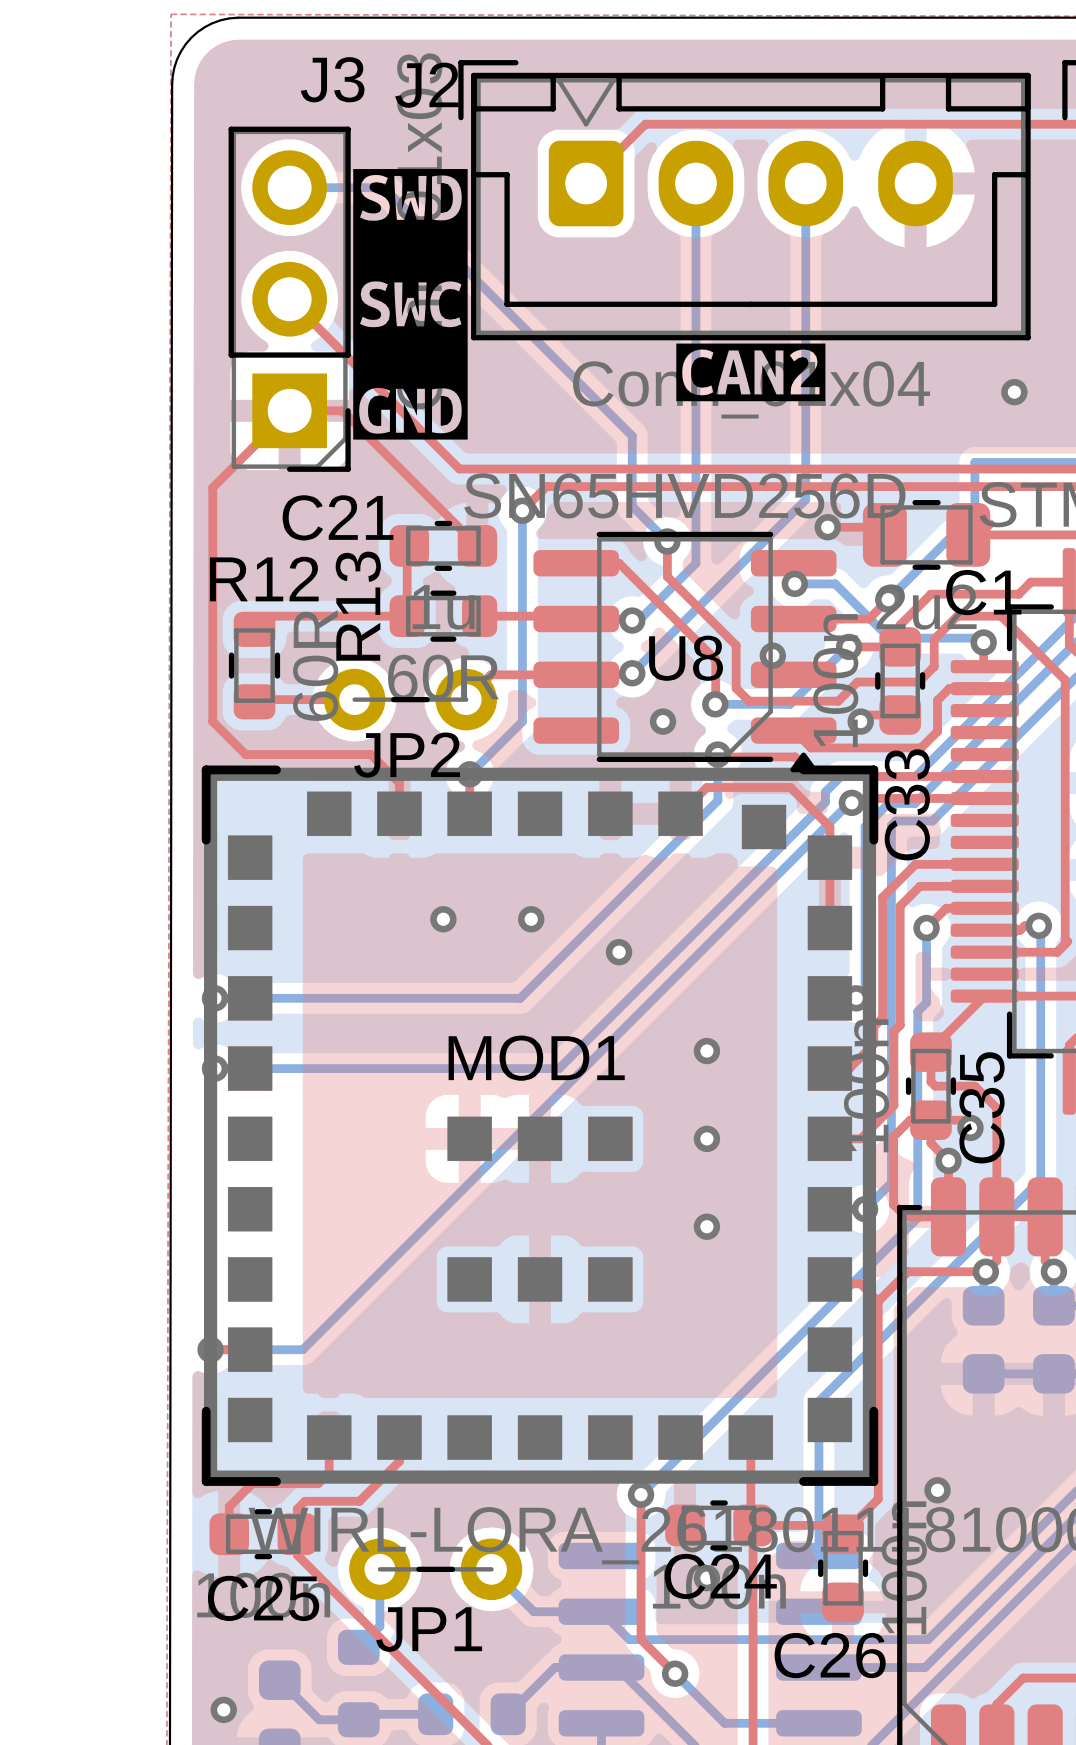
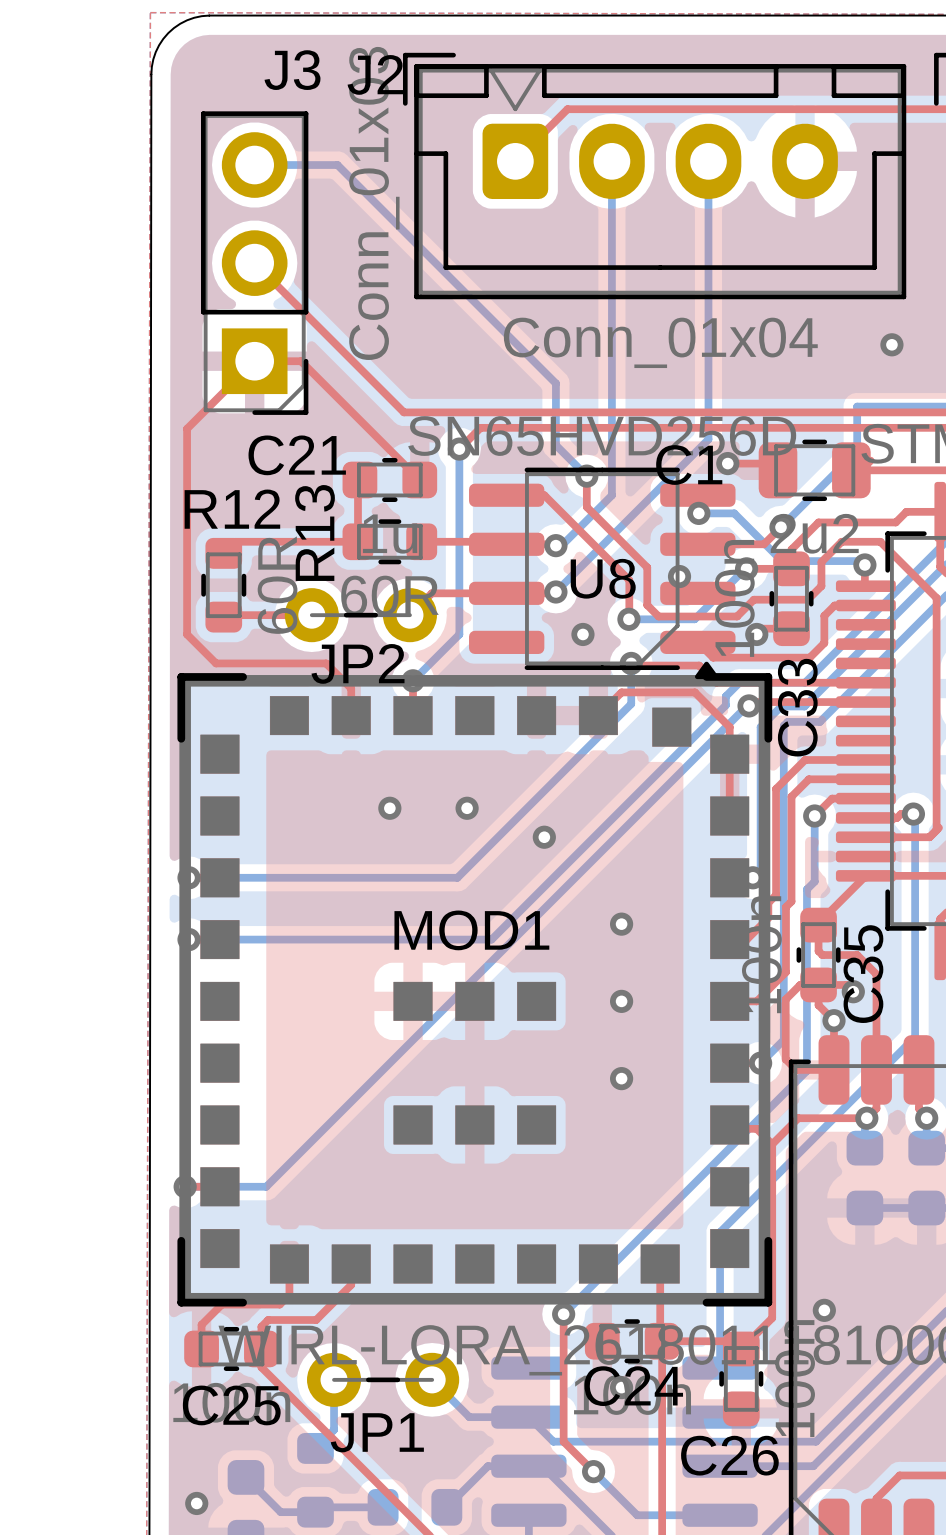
drawing: [353, 169, 468, 440] -> none
drawing: [676, 343, 826, 402] -> none
C1 name position: C1 (983, 592) -> C1 (689, 465)

